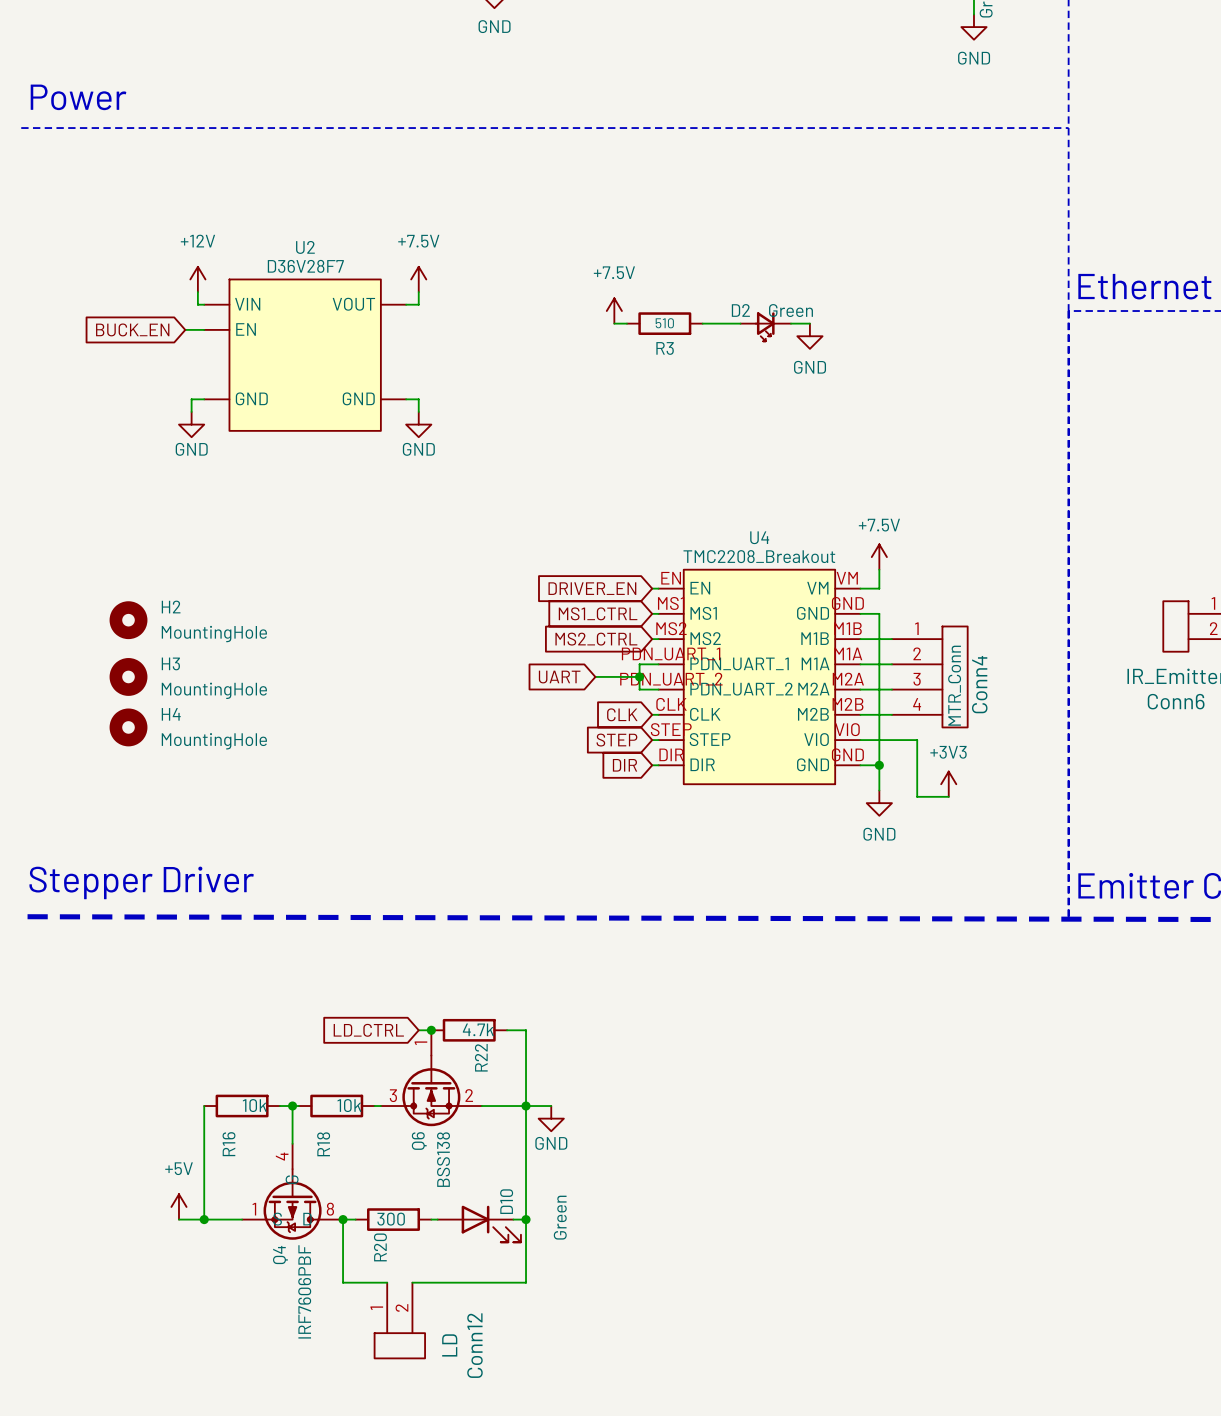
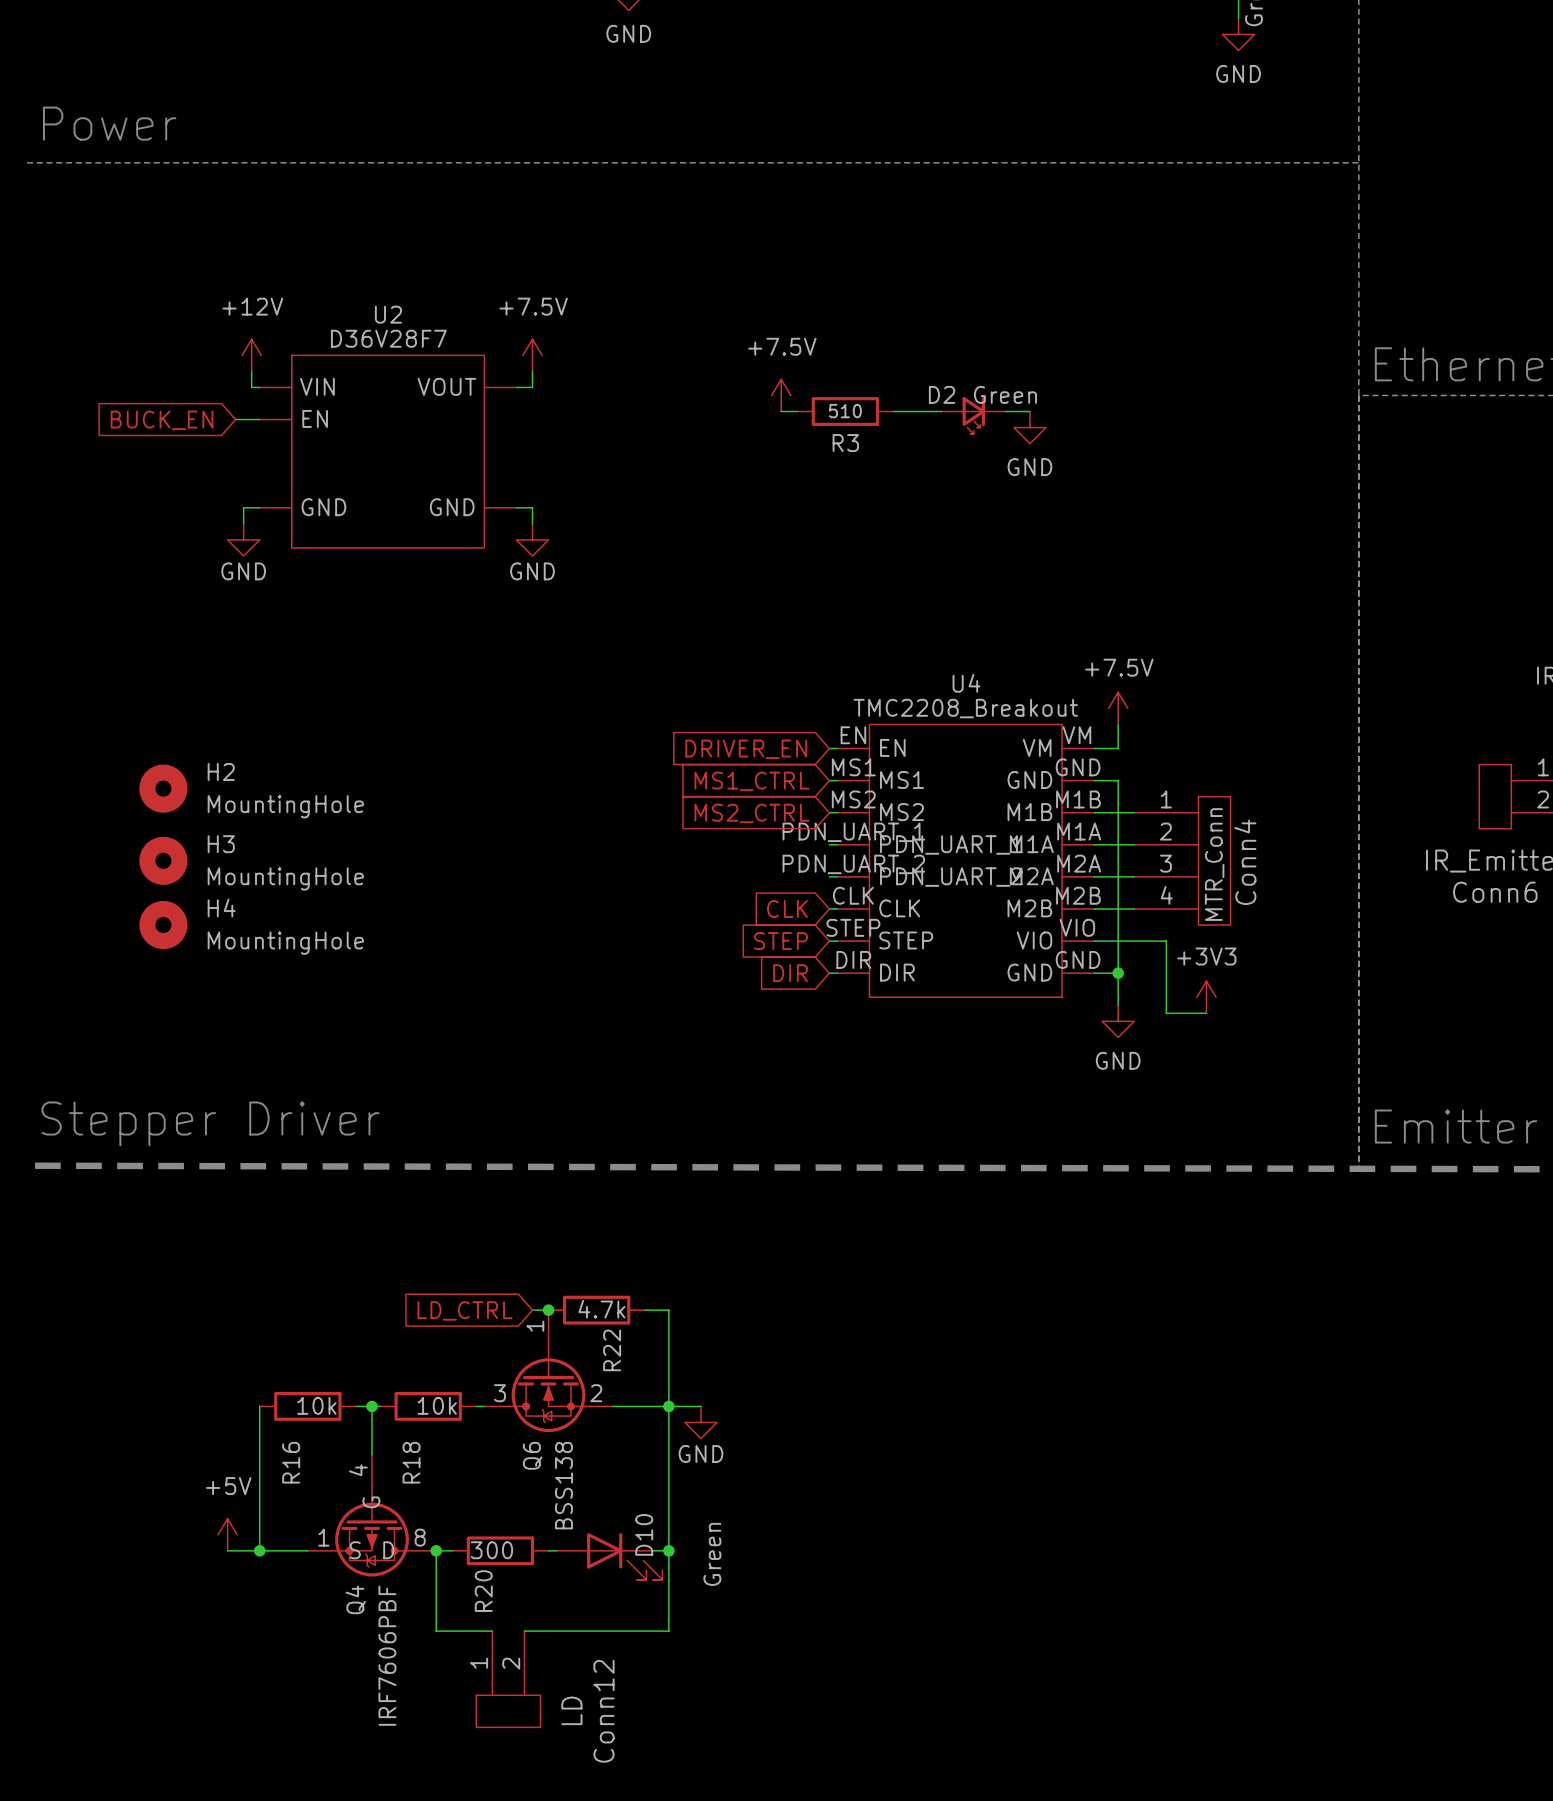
wire: (652, 664) (639, 664) (639, 689) (652, 689) -> none
wire: (595, 676) (639, 676) -> none
junction: (639, 676) -> none
global label: UART (559, 677) -> none

